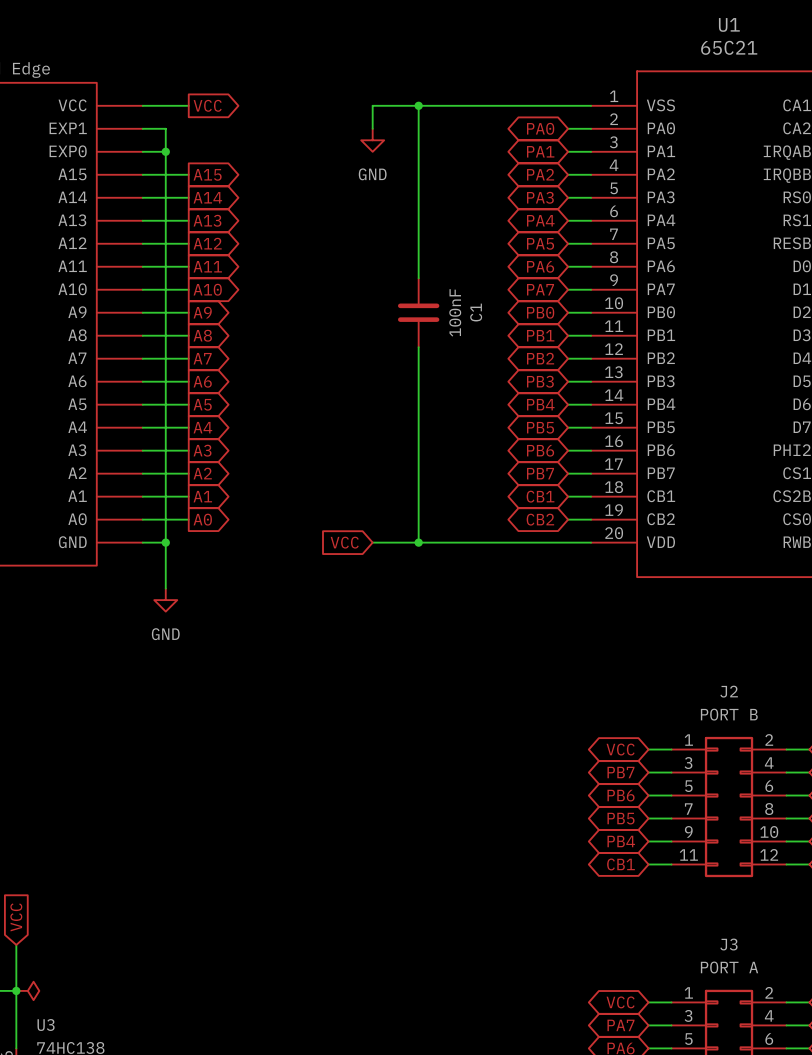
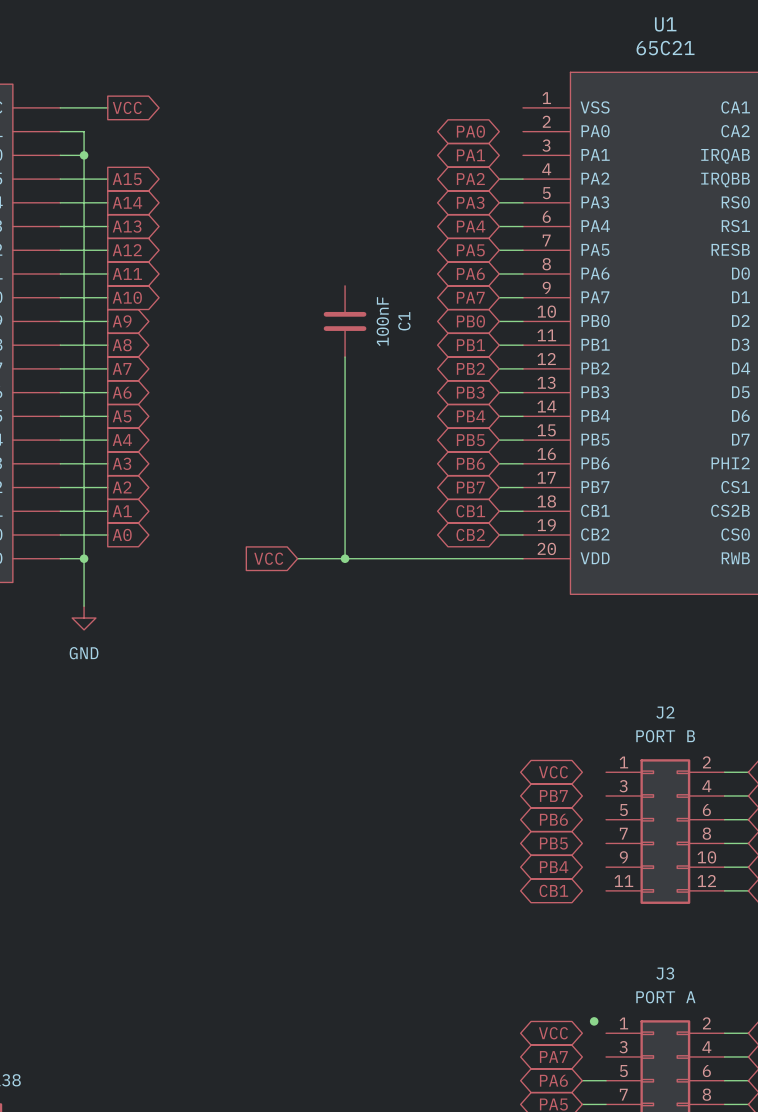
wire: (418, 105) (418, 278) -> none
junction: (418, 105) -> none
wire: (591, 105) (372, 105) (372, 128) -> none
wire: (568, 128) (591, 128) -> none
power symbol: GND (372, 140) -> none
wire: (568, 151) (591, 151) -> none
wire: (648, 749) (671, 749) -> none
wire: (648, 772) (671, 772) -> none
wire: (648, 795) (671, 795) -> none
wire: (648, 818) (671, 818) -> none
wire: (648, 841) (671, 841) -> none
wire: (648, 864) (671, 864) -> none
junction: none -> (594, 1021)
wire: (648, 1002) (671, 1002) -> none
wire: (648, 1025) (671, 1025) -> none

